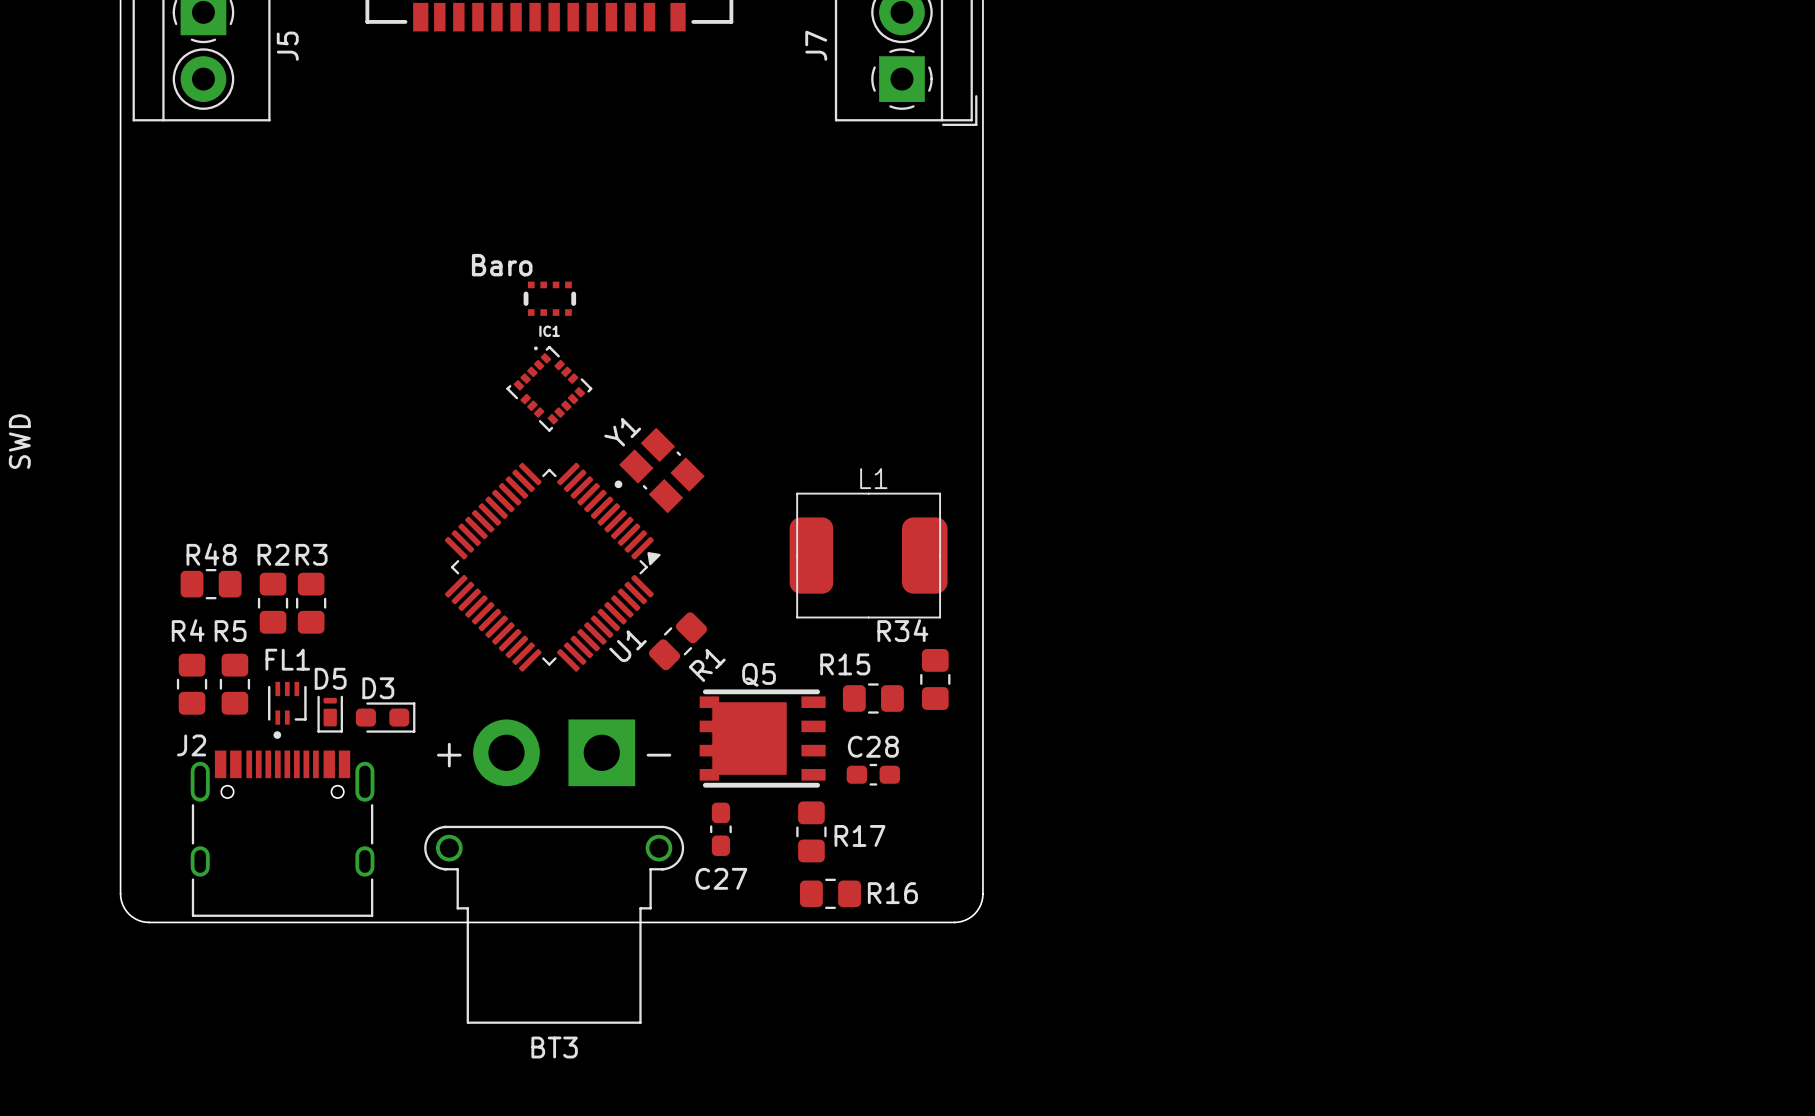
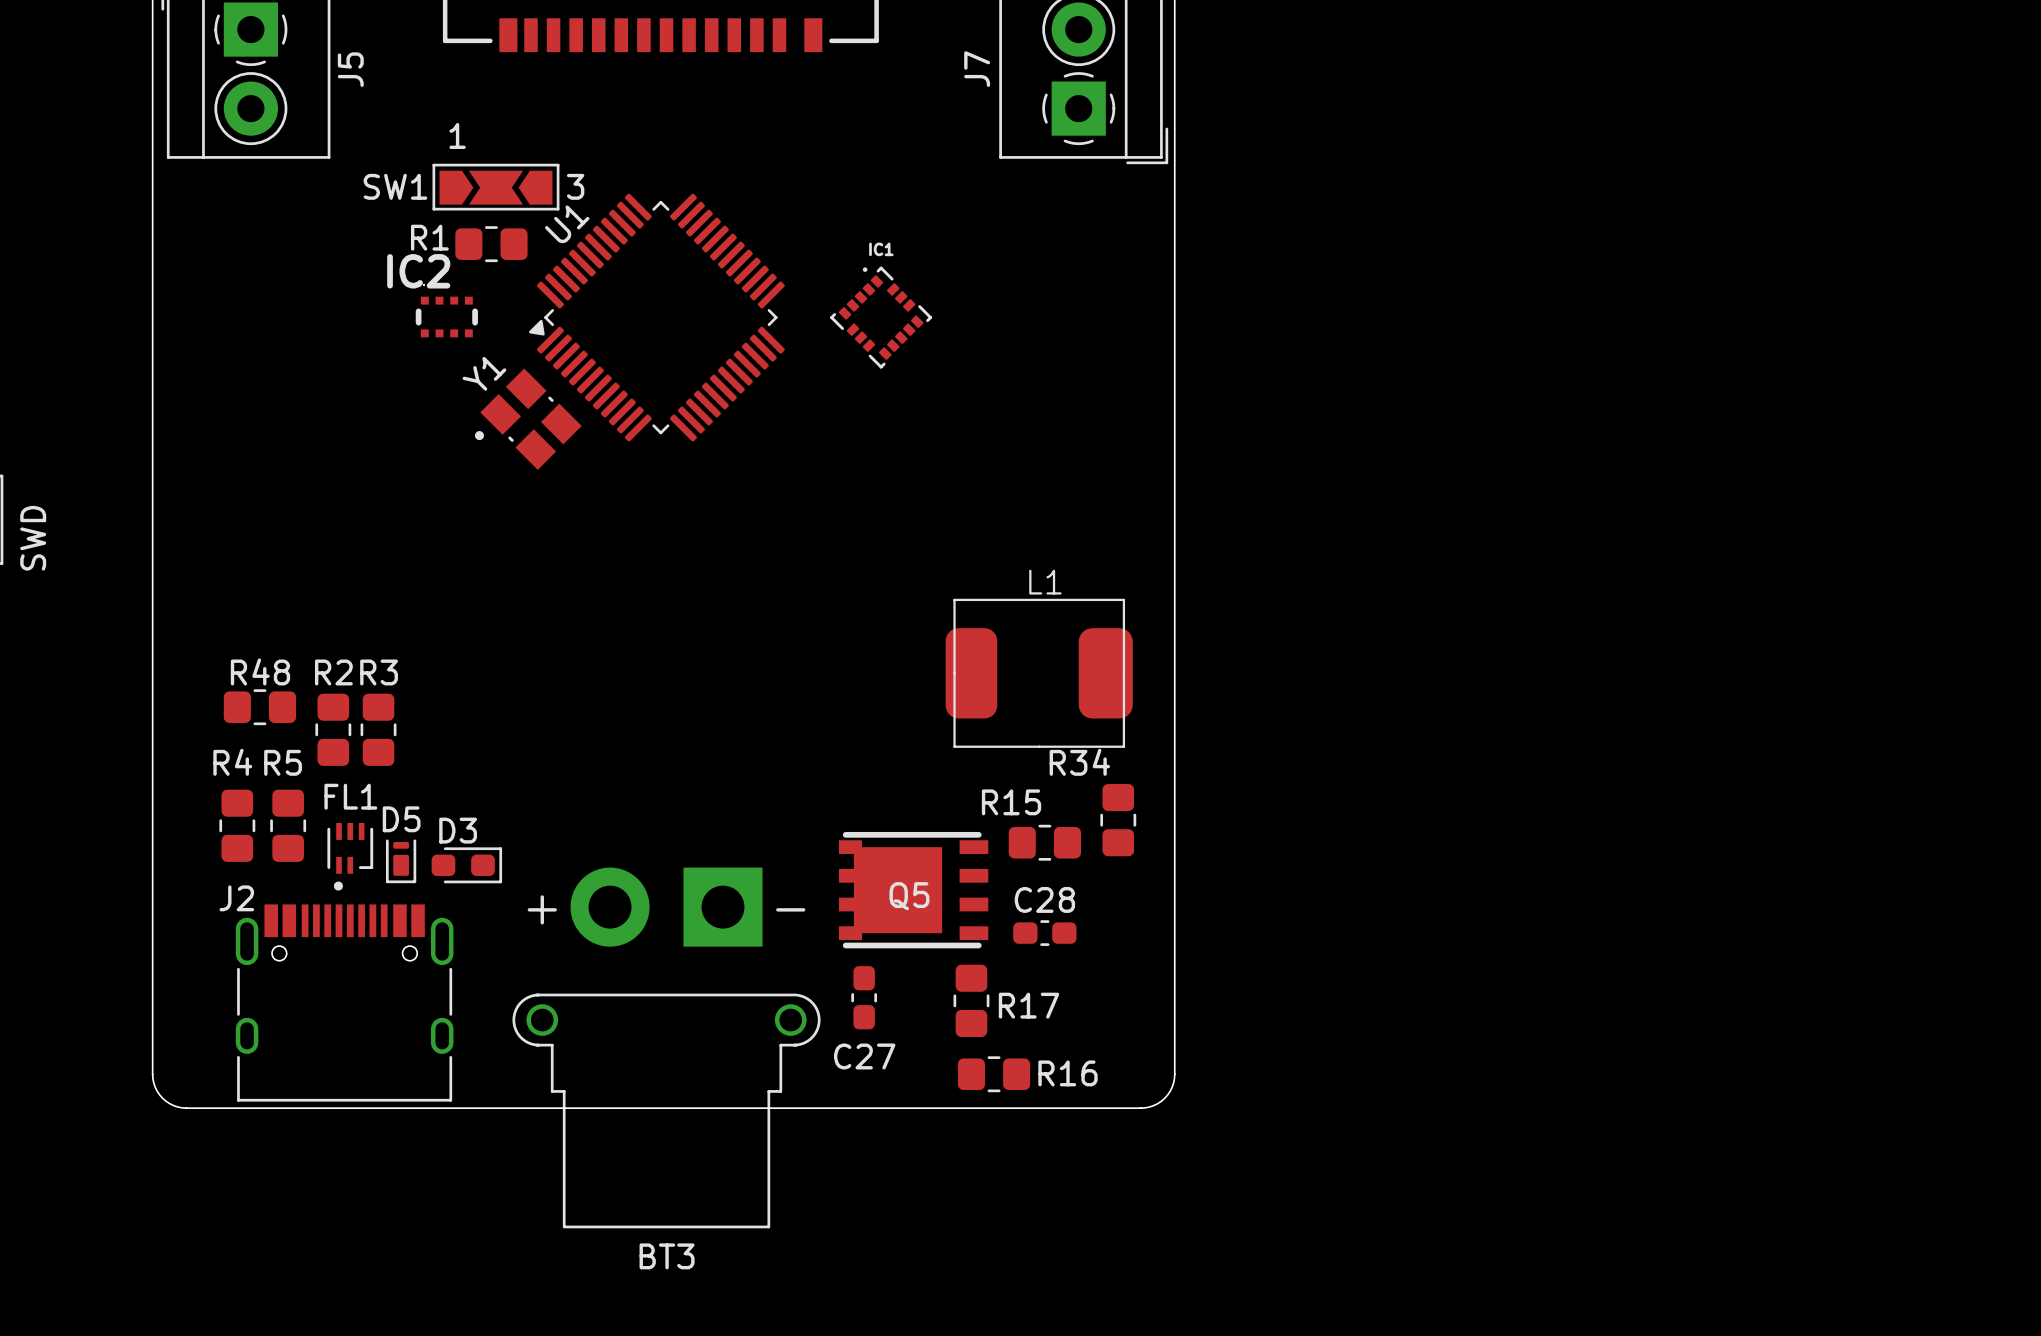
SW1: none -> (495, 187)
IC2: none -> (446, 310)
Baro: (549, 293) -> none
IC1 position: (549, 388) -> (881, 317)
Y1 position: (659, 470) -> (528, 419)
U1 rotation: 0° (552, 567) -> 180° (656, 317)
U1 position: (552, 567) -> (656, 317)
R1 rotation: 0° (678, 641) -> 45° clockwise (491, 244)
R1 position: (678, 641) -> (491, 244)
R1 name position: R1 (707, 665) -> R1 (429, 237)
Q5 name position: Q5 (759, 674) -> Q5 (909, 896)

